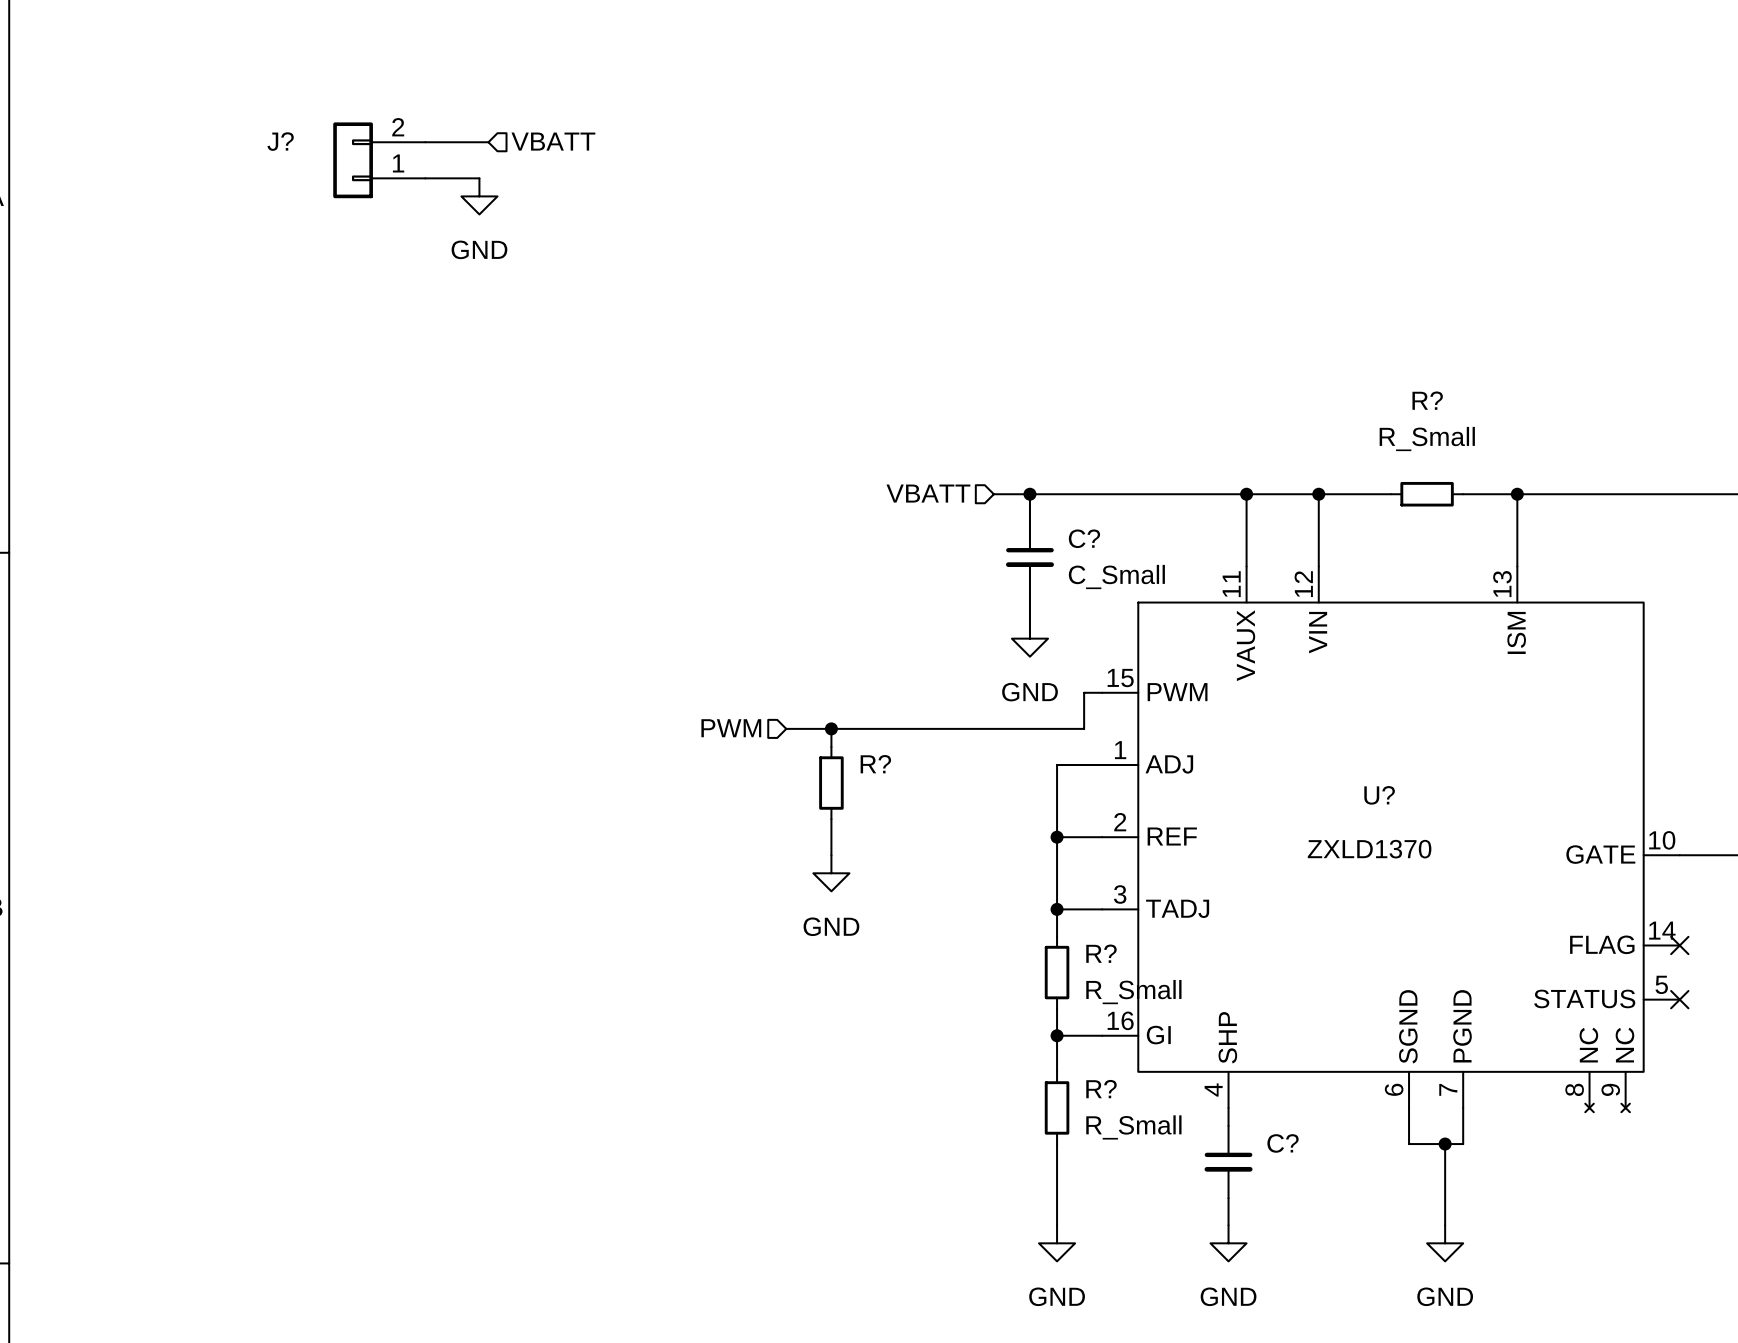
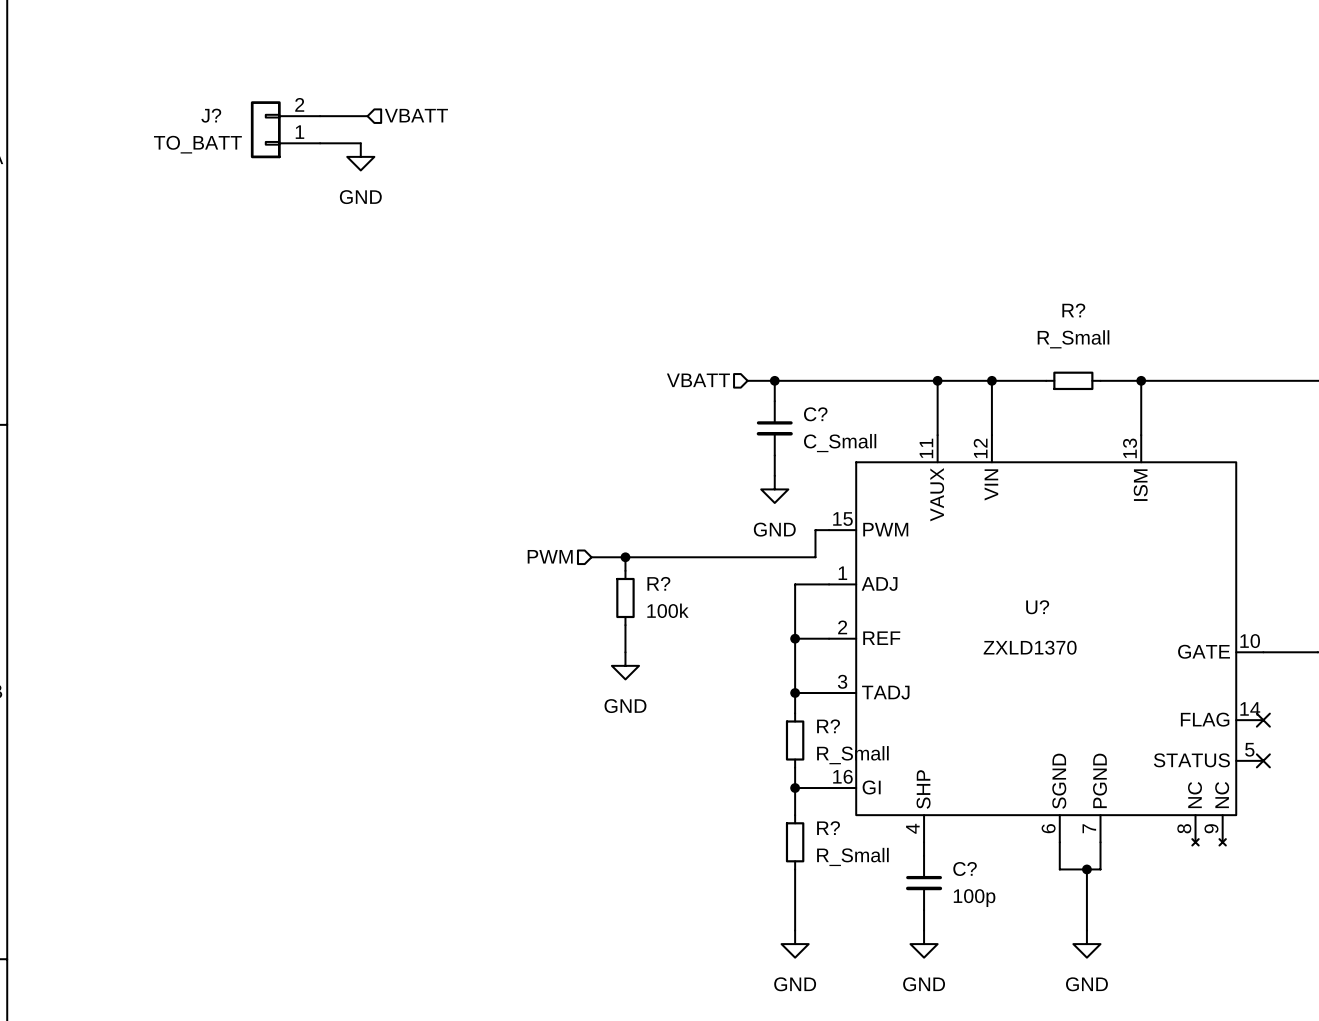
J? value: none -> TO_BATT (197, 144)
R? value: none -> 100k (667, 610)
C? value: none -> 100p (974, 898)

